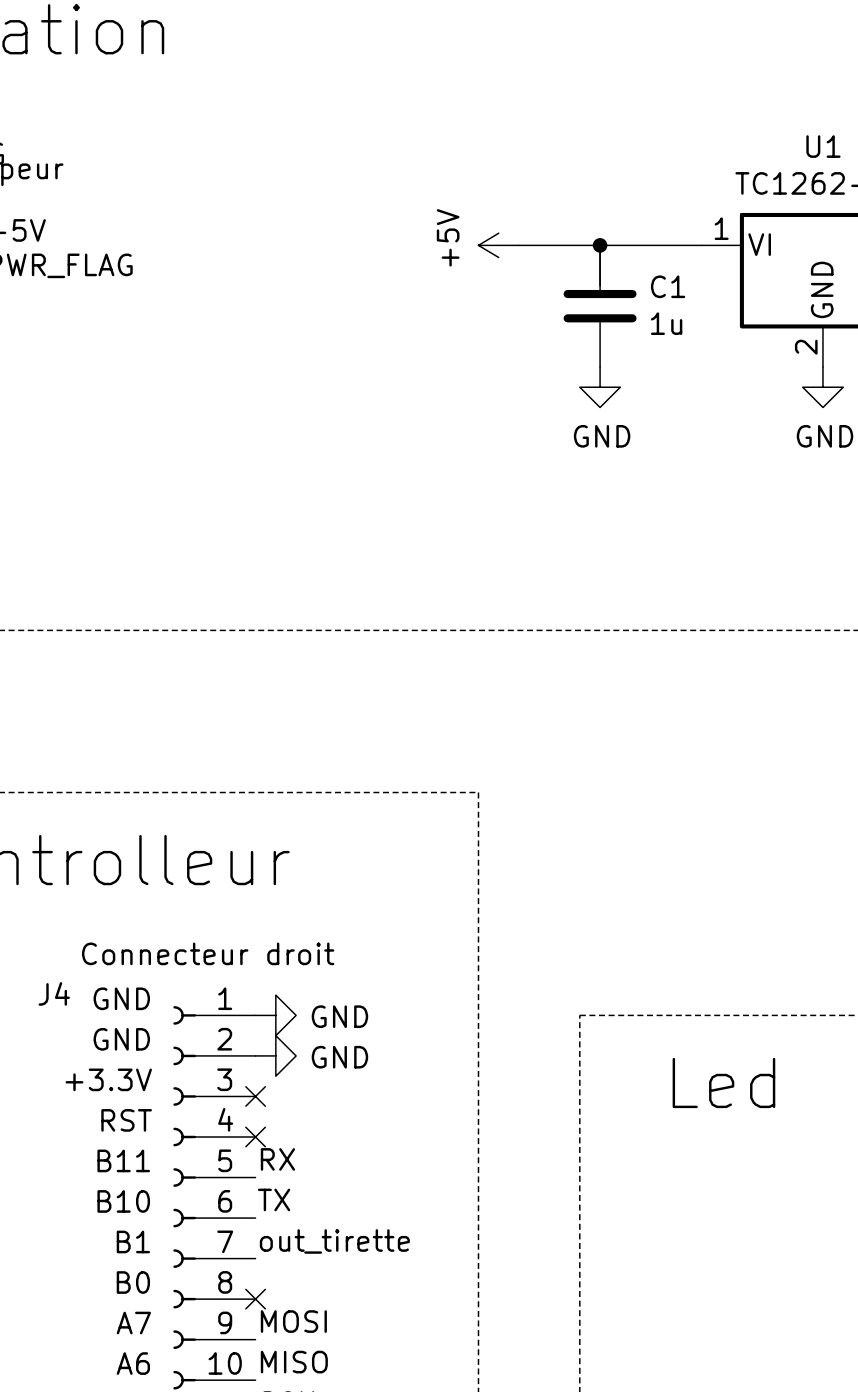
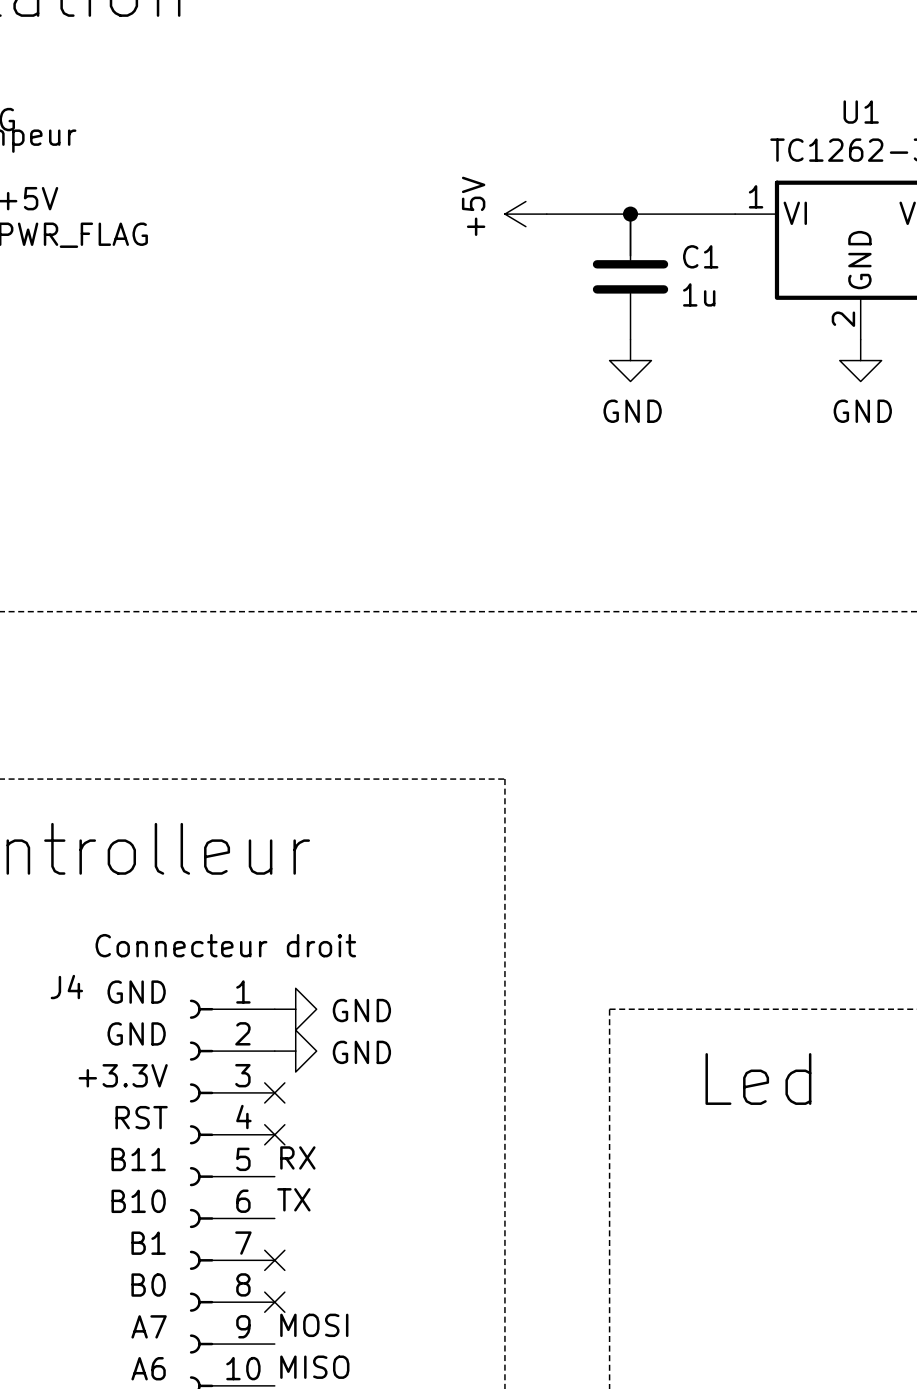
label: out_tirette (334, 1241) -> none
no-connect mark: none -> (274, 1260)

